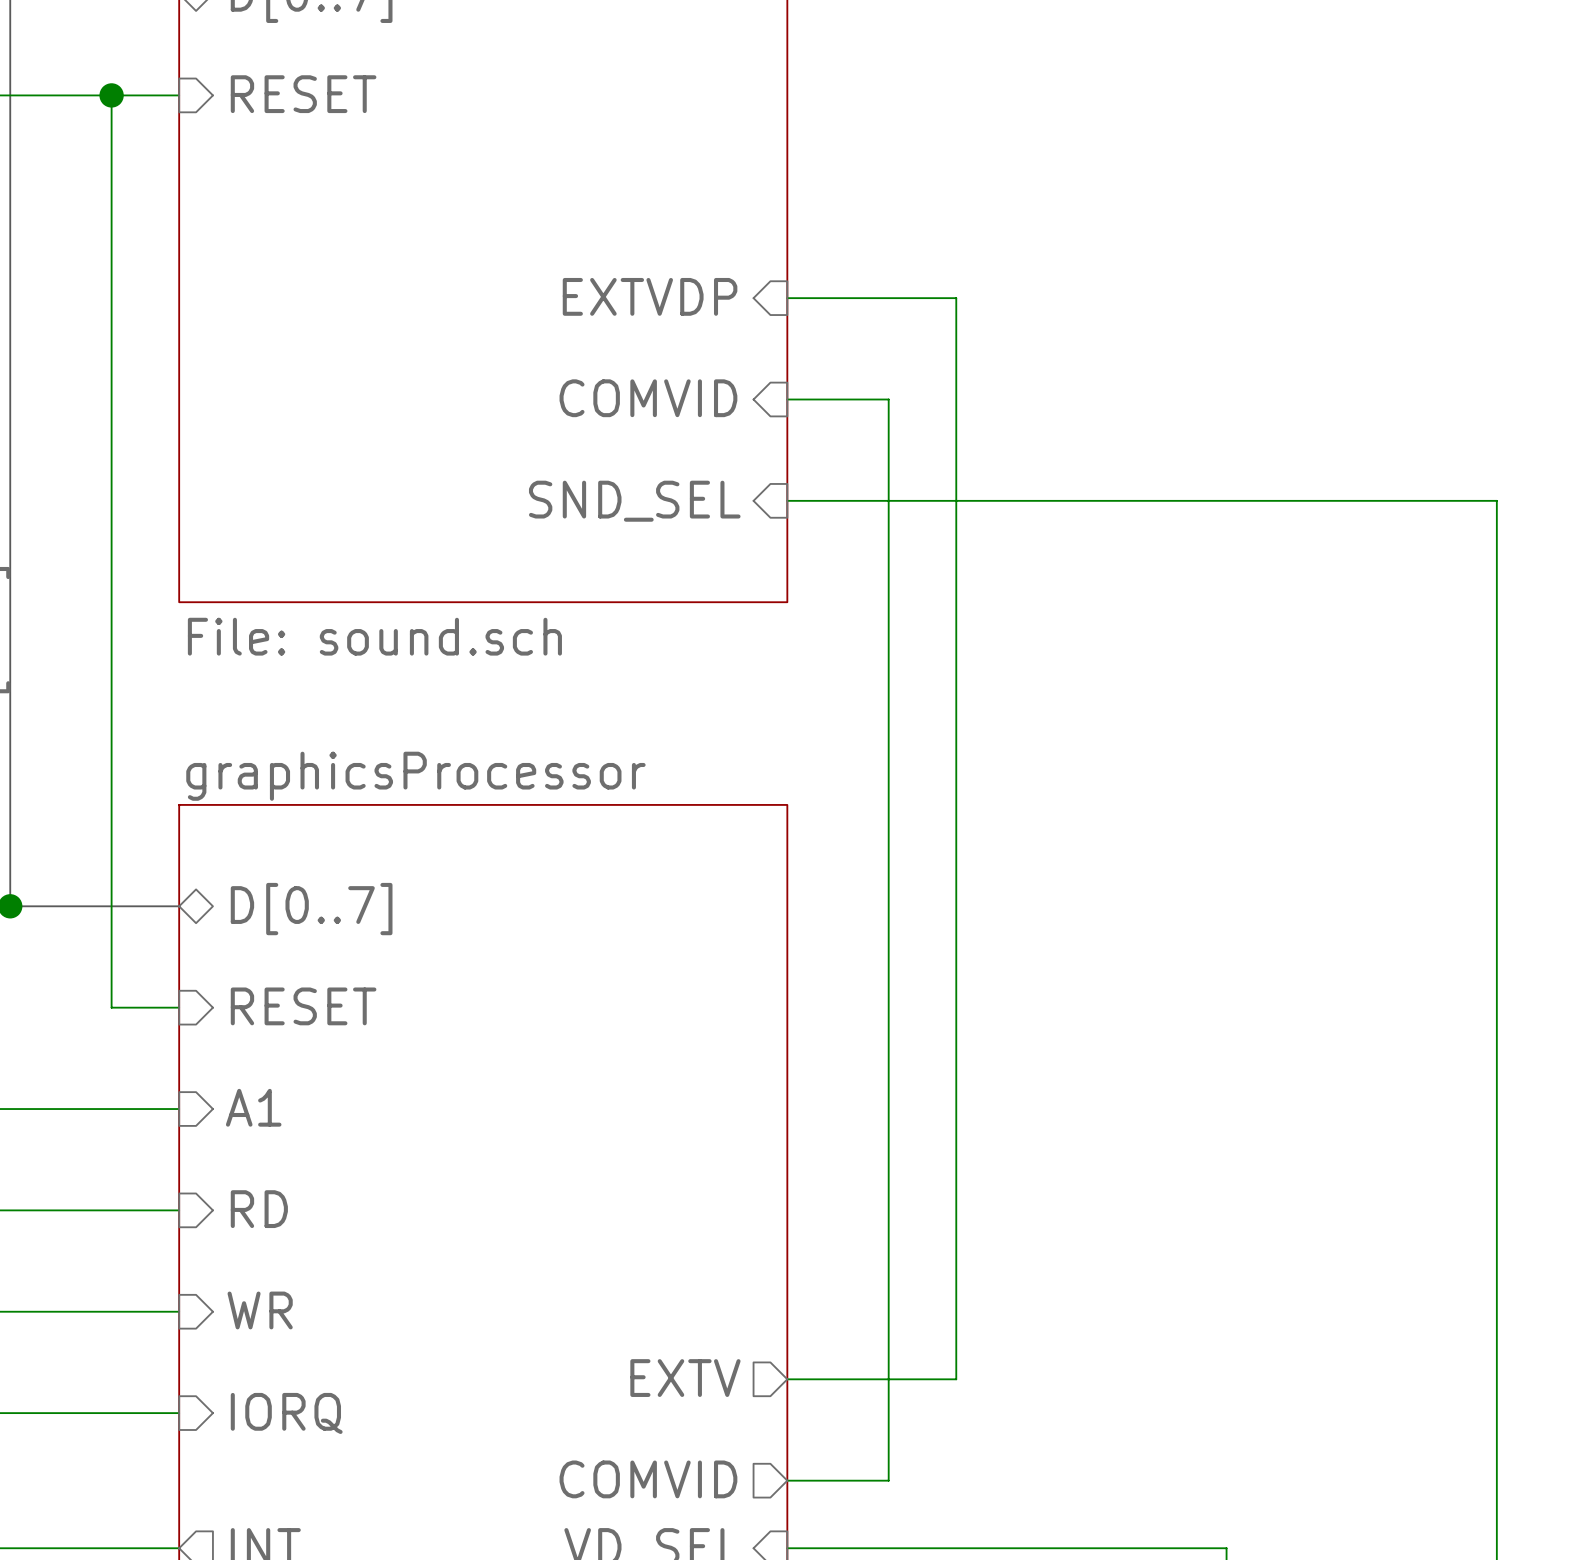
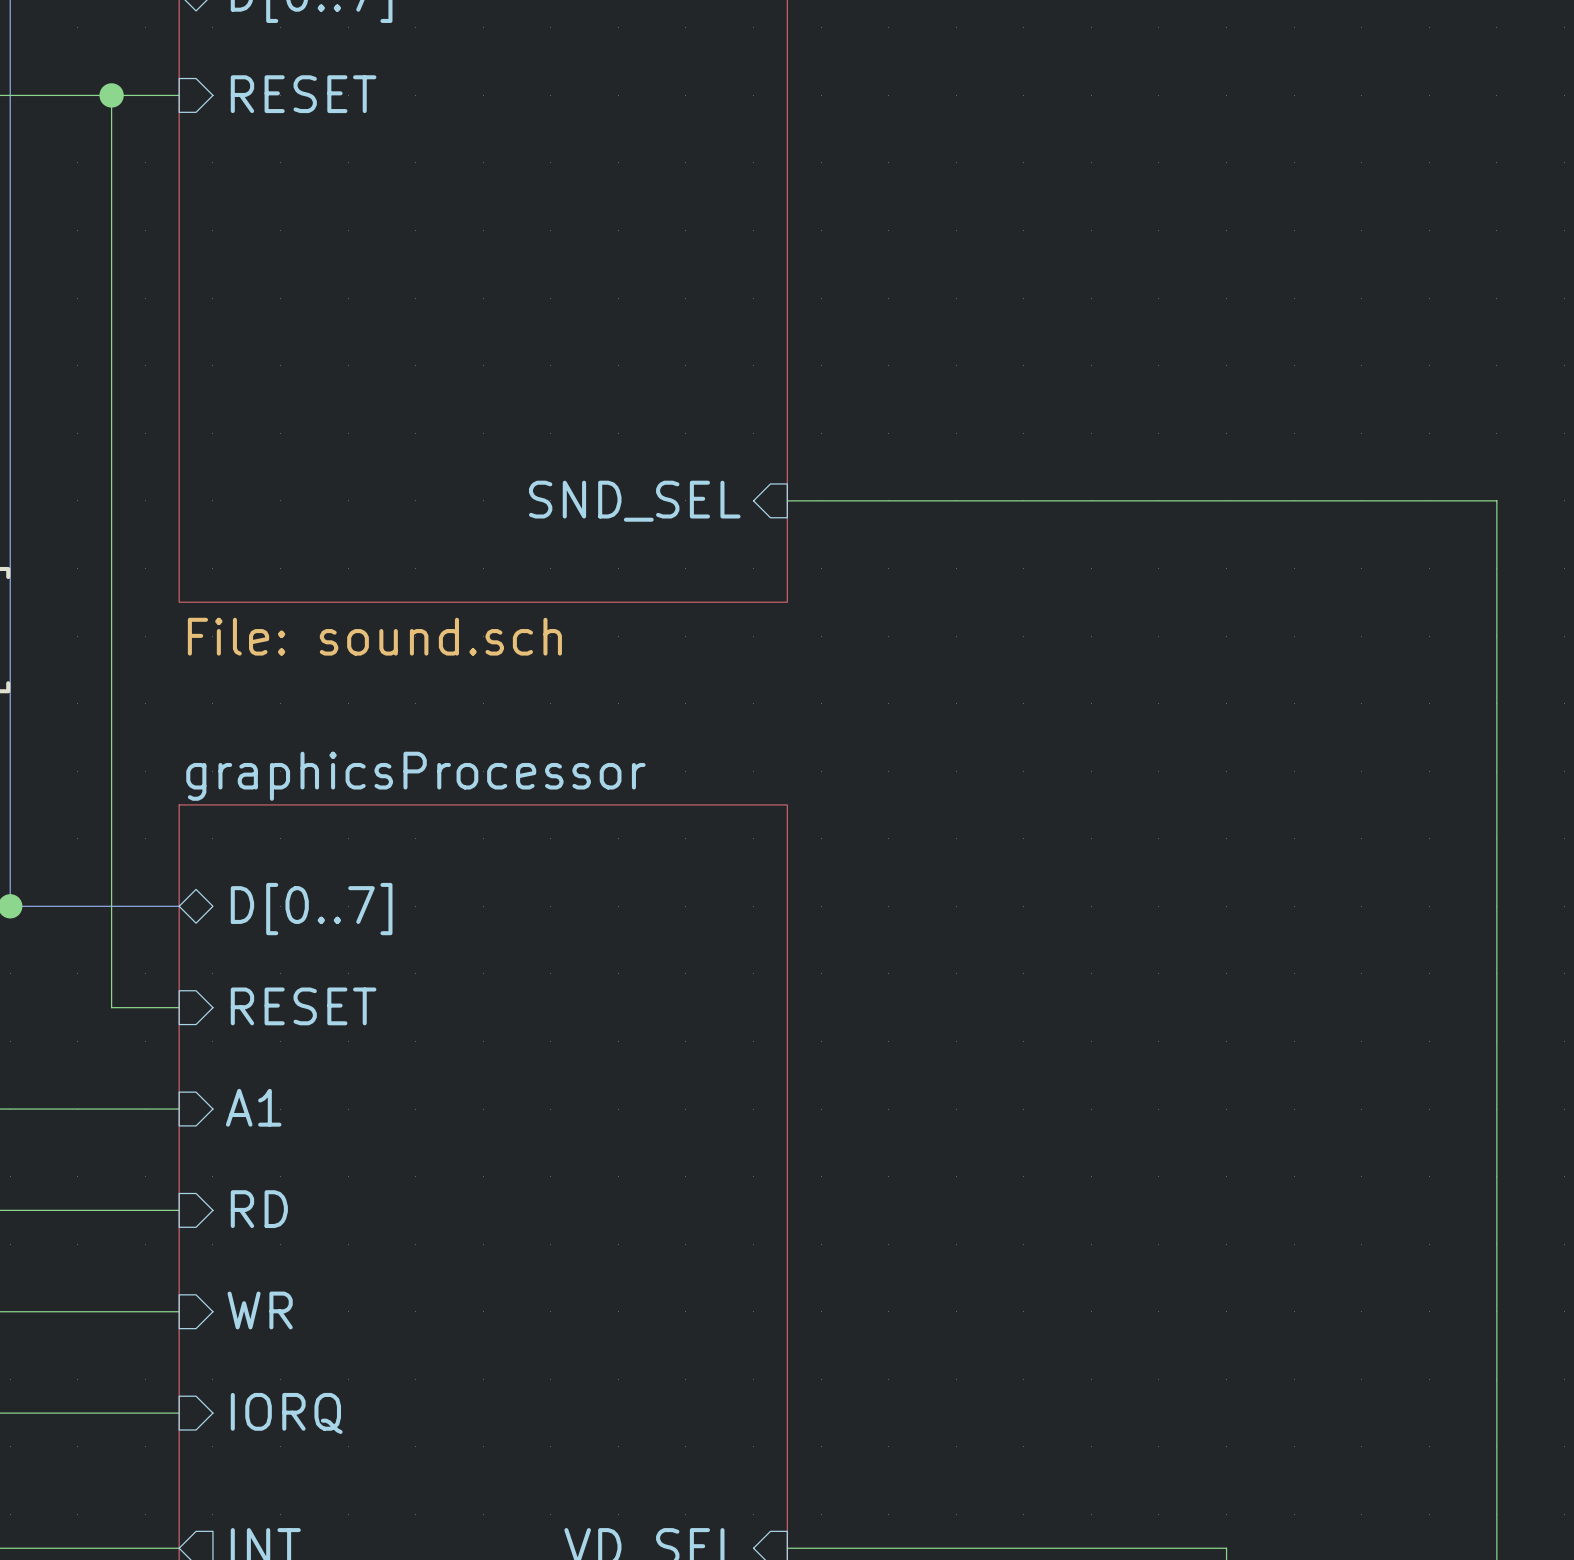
sheet pin: EXTVDP (650, 296) -> none
wire: (787, 298) (956, 298) (956, 1379) (787, 1379) -> none
sheet pin: COMVID (648, 398) -> none
wire: (787, 399) (888, 399) (888, 1480) (787, 1480) -> none
sheet pin: EXTV (685, 1378) -> none
sheet pin: COMVID (648, 1479) -> none

